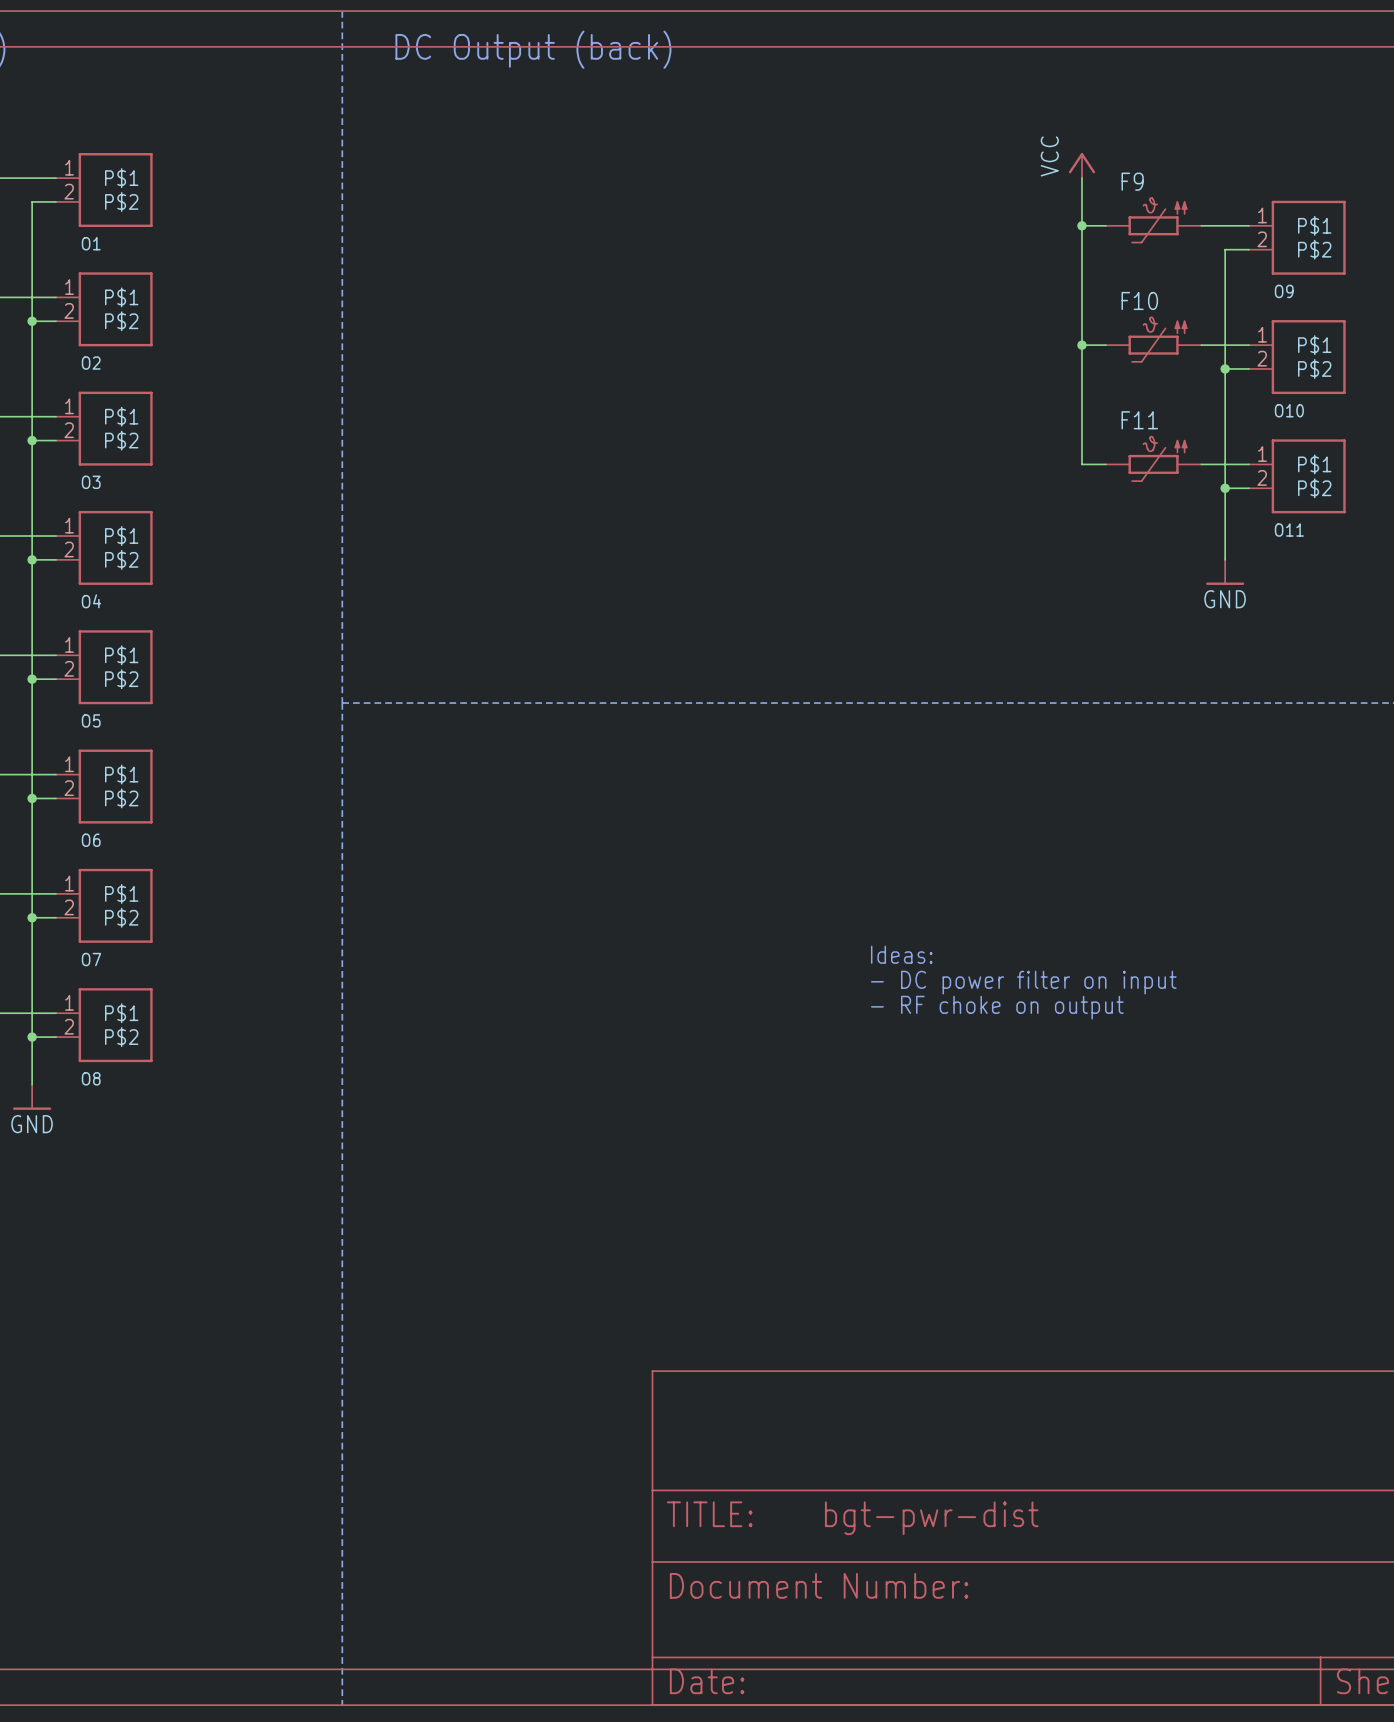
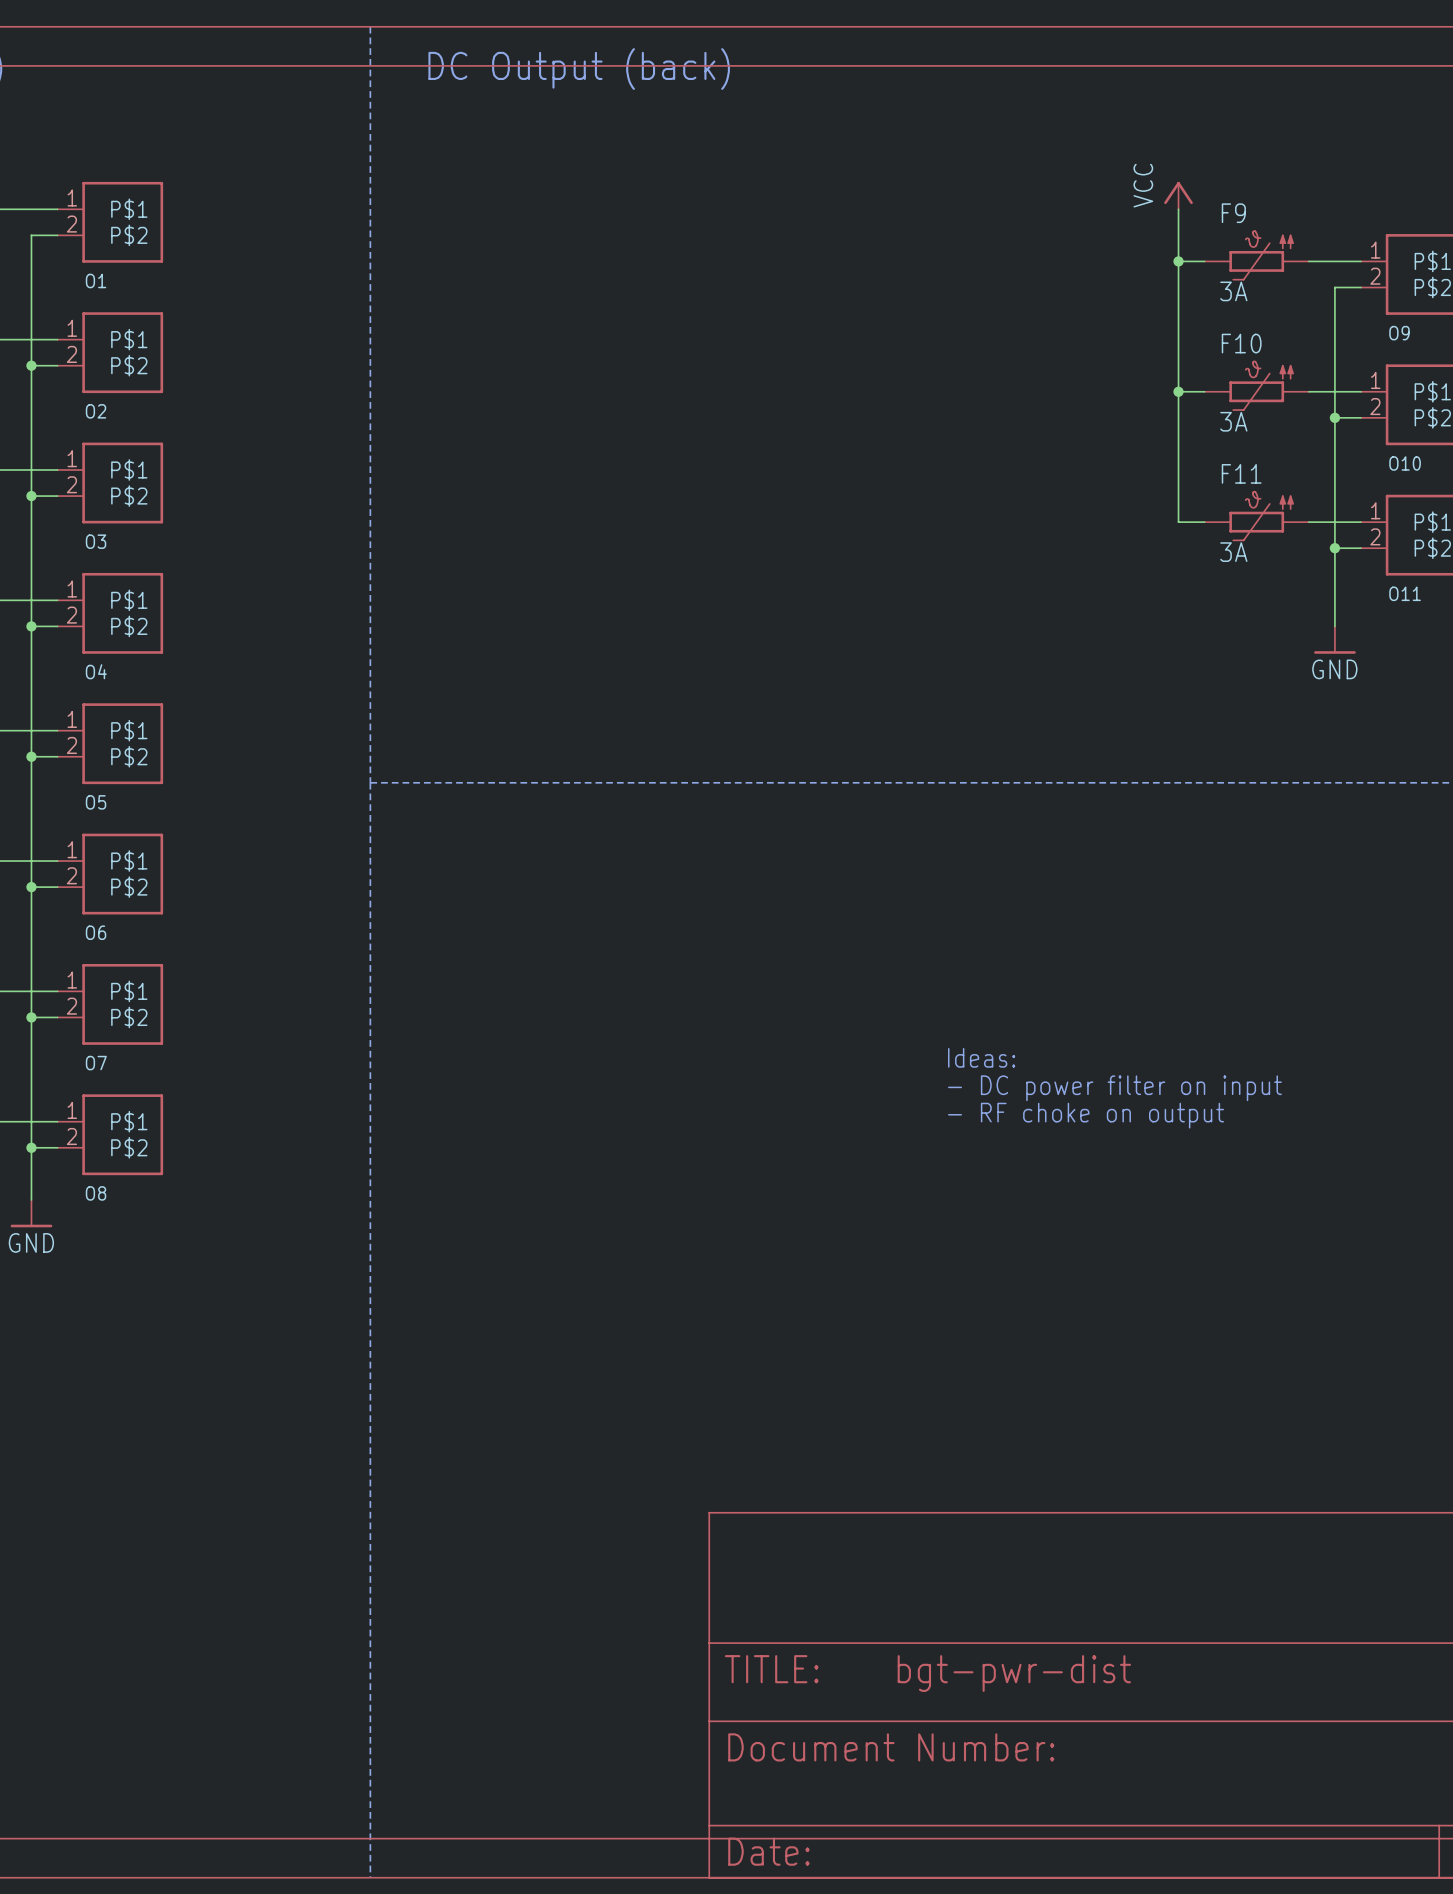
F9 value: none -> 3A (1233, 291)
F10 value: none -> 3A (1233, 421)
F11 value: none -> 3A (1233, 552)

